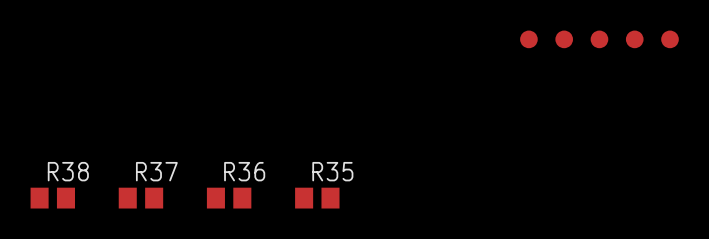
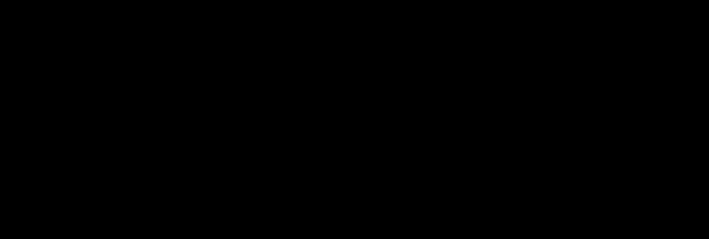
part: (528, 39) -> none
part: (564, 39) -> none
part: (599, 39) -> none
part: (634, 39) -> none
part: (670, 39) -> none
R38: (52, 198) -> none
R37: (140, 198) -> none
R36: (229, 198) -> none
R35: (317, 198) -> none

